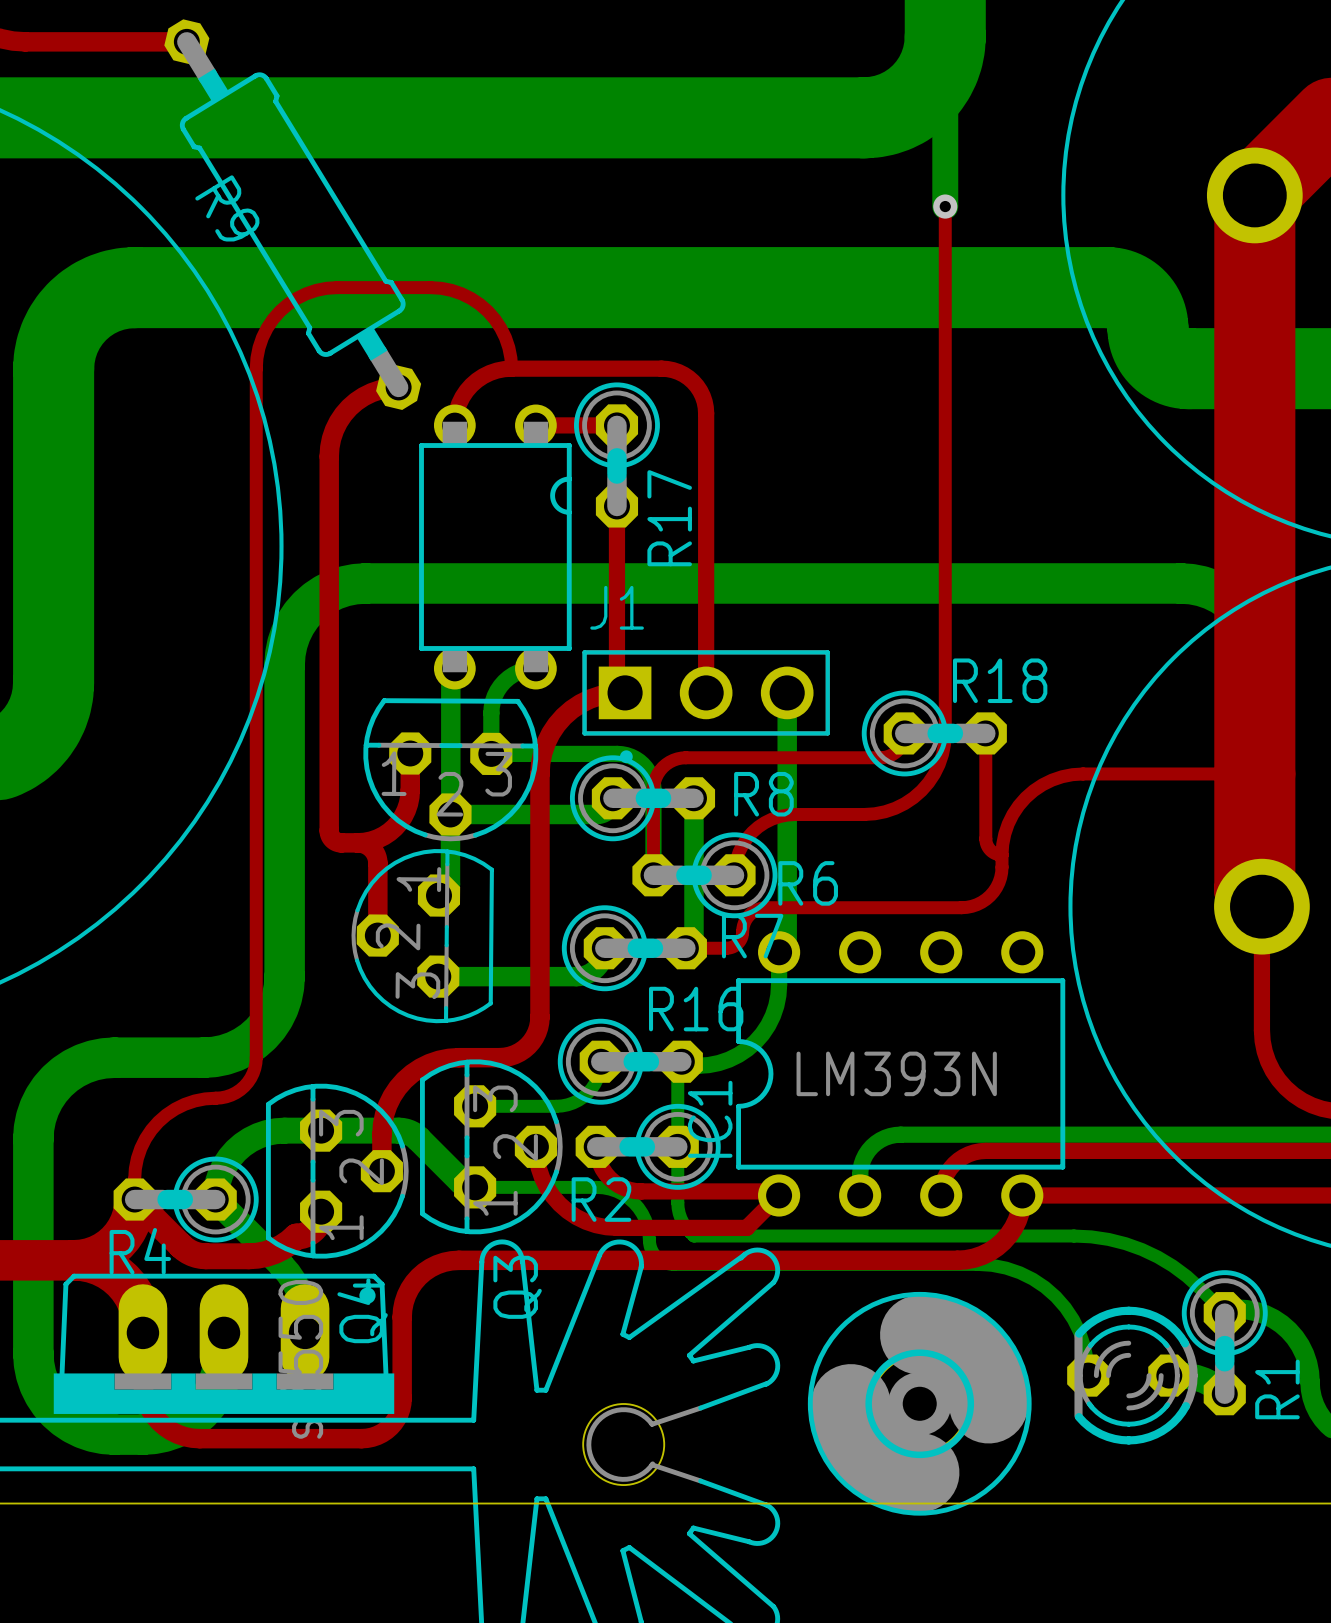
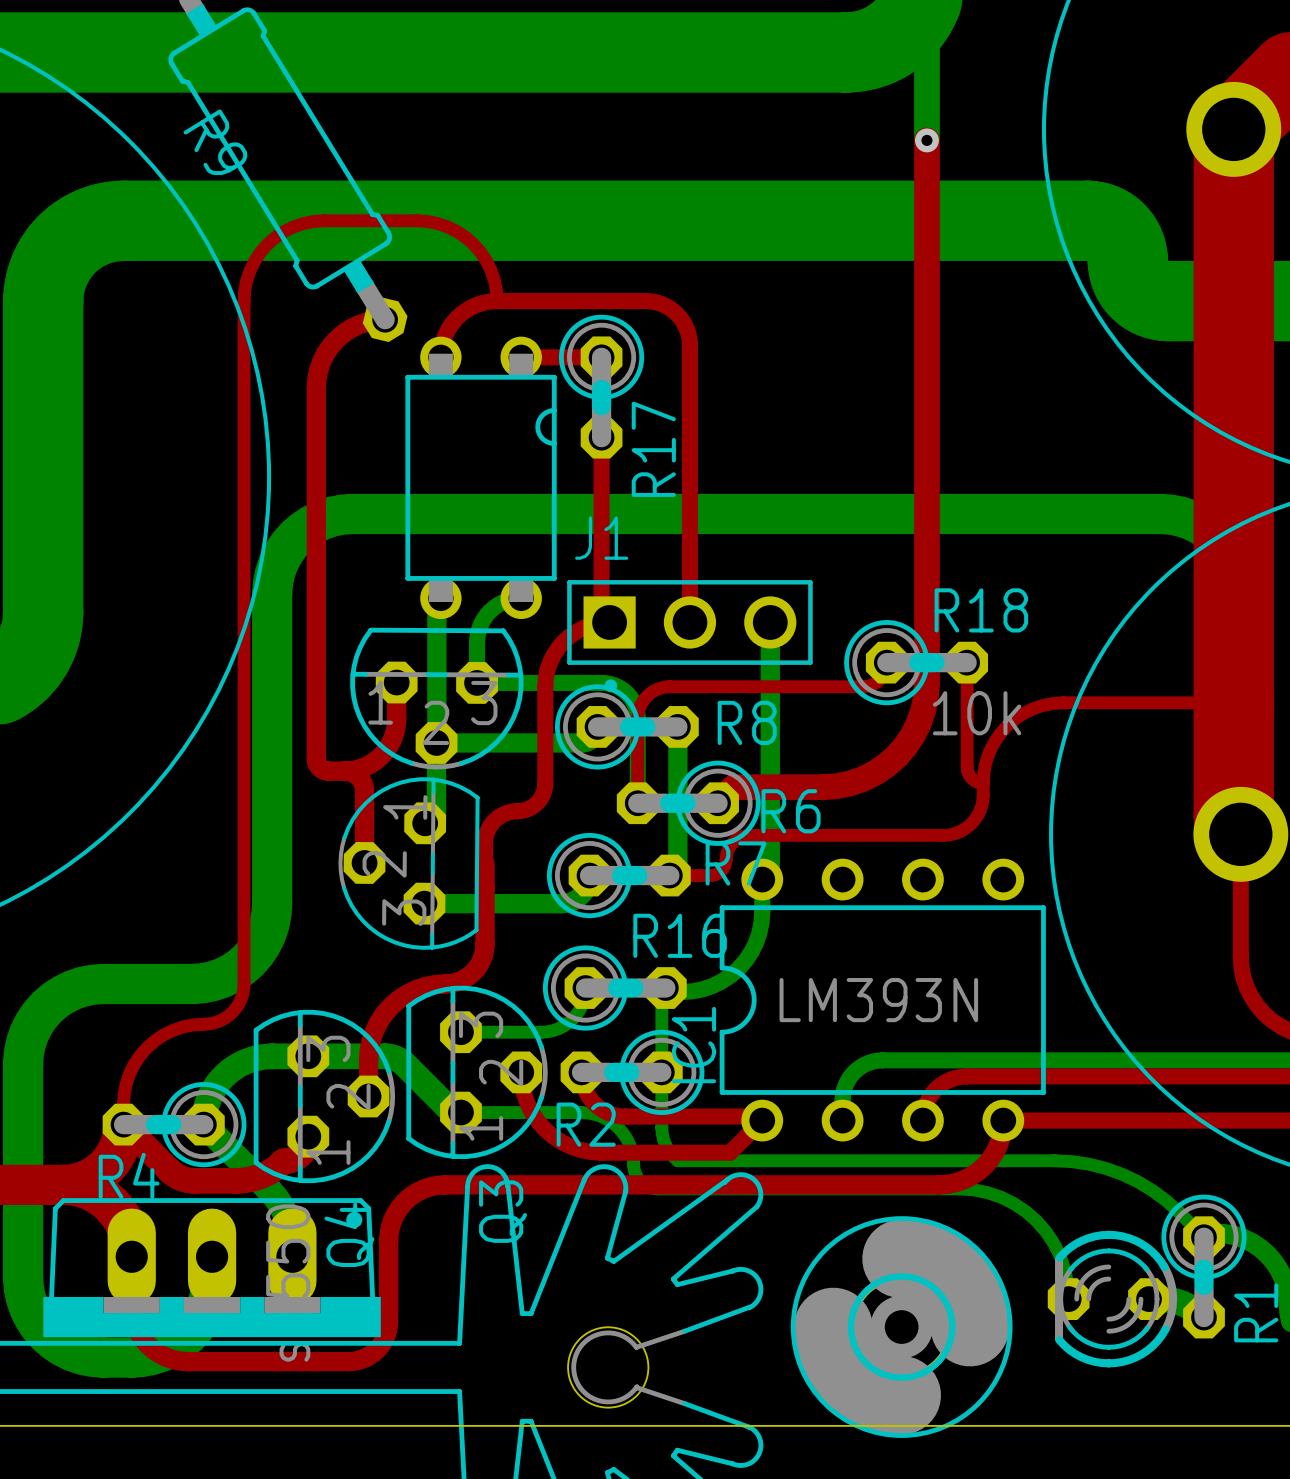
top track width: thin (945, 206) (945, 733) -> thick (926, 140) (926, 662)
top track: (625, 692) (600, 695) (571, 709) (550, 733) (542, 752) (539, 773) (539, 1017) (536, 1032) (528, 1045) (509, 1056) (458, 1057) -> (609, 622) (585, 627) (570, 635) (558, 647) (550, 662) (545, 686) (544, 790) (534, 805) (524, 810) (504, 813) (497, 817) (489, 827) (485, 839) (485, 887)
top track: (945, 733) (942, 754) (934, 773) (913, 797) (895, 808) (874, 813) (795, 814) (772, 819) (758, 827) (742, 844) (736, 859) (734, 875) -> (926, 662) (926, 696) (919, 722) (905, 746) (886, 765) (862, 779) (836, 786) (734, 787) (718, 803)
R18 value: none -> 10k (977, 713)
top track: none -> (485, 863) (483, 954) (476, 968) (469, 975) (460, 980) (444, 984)

